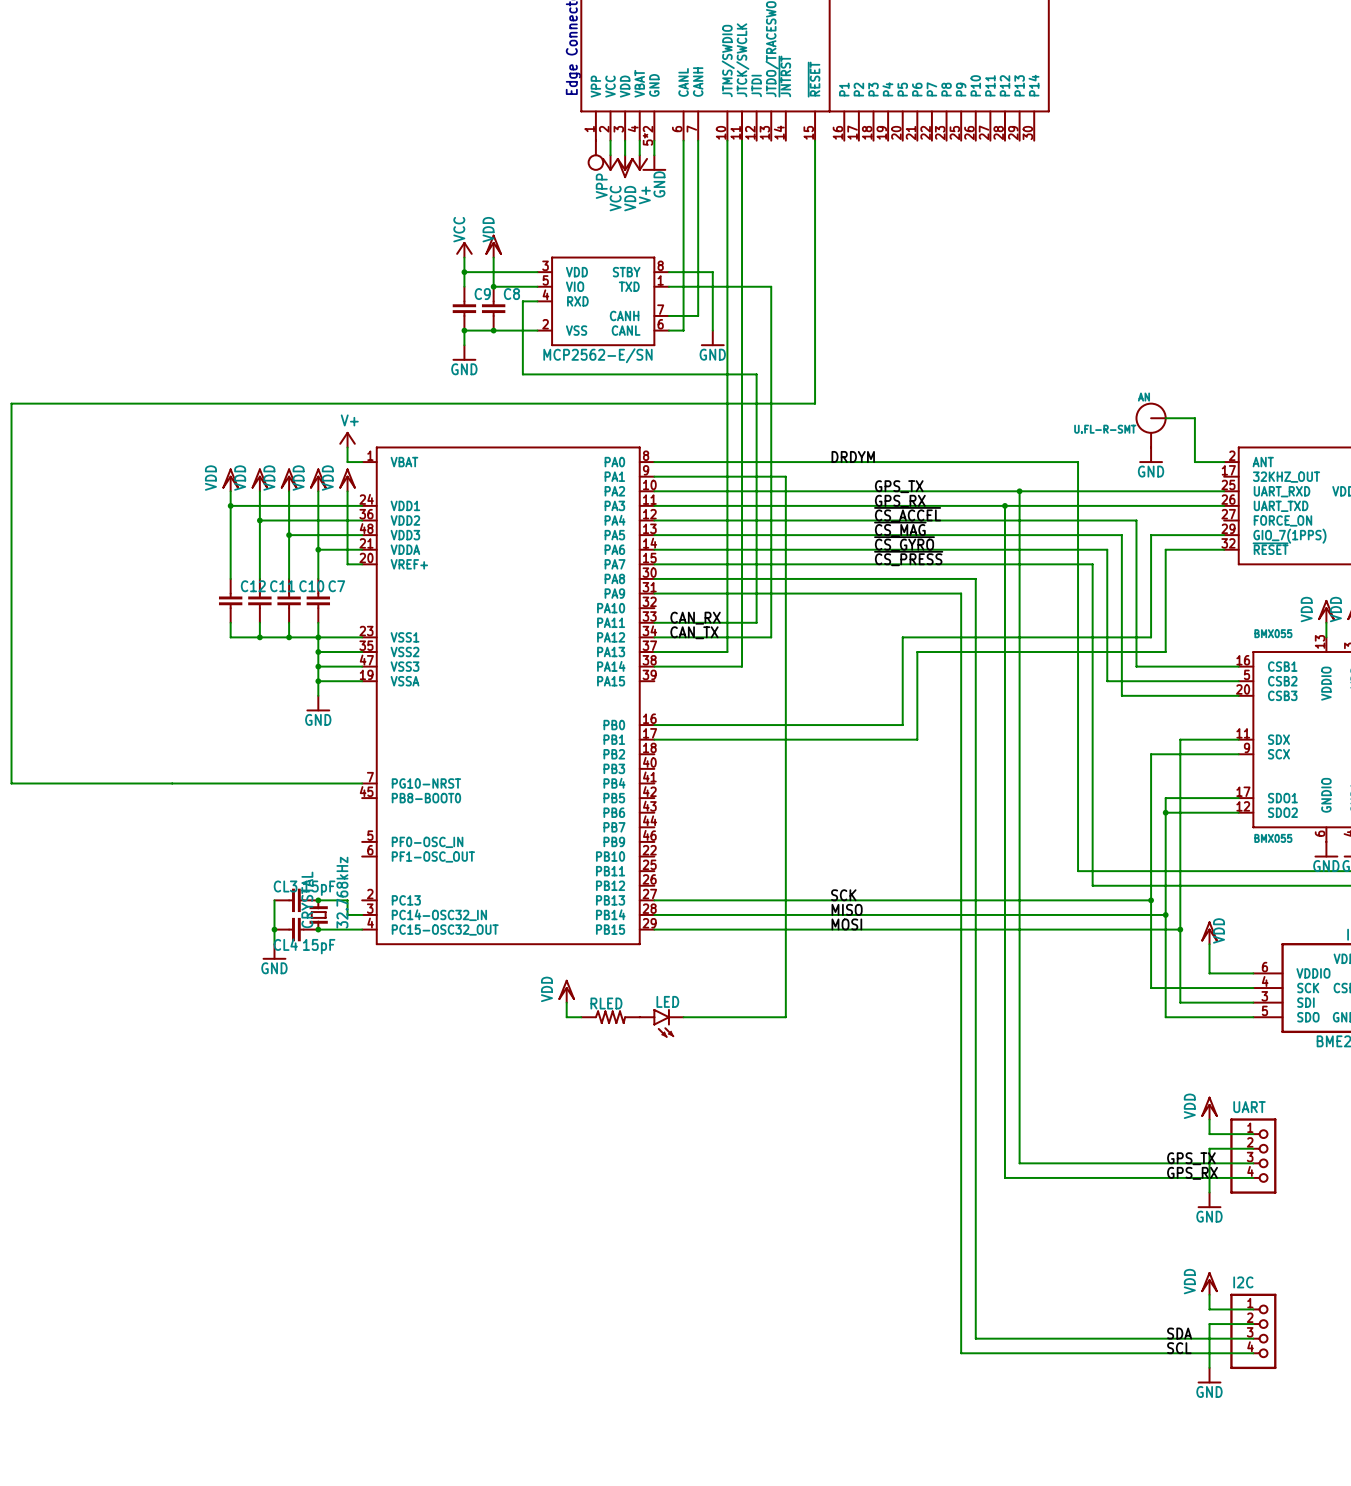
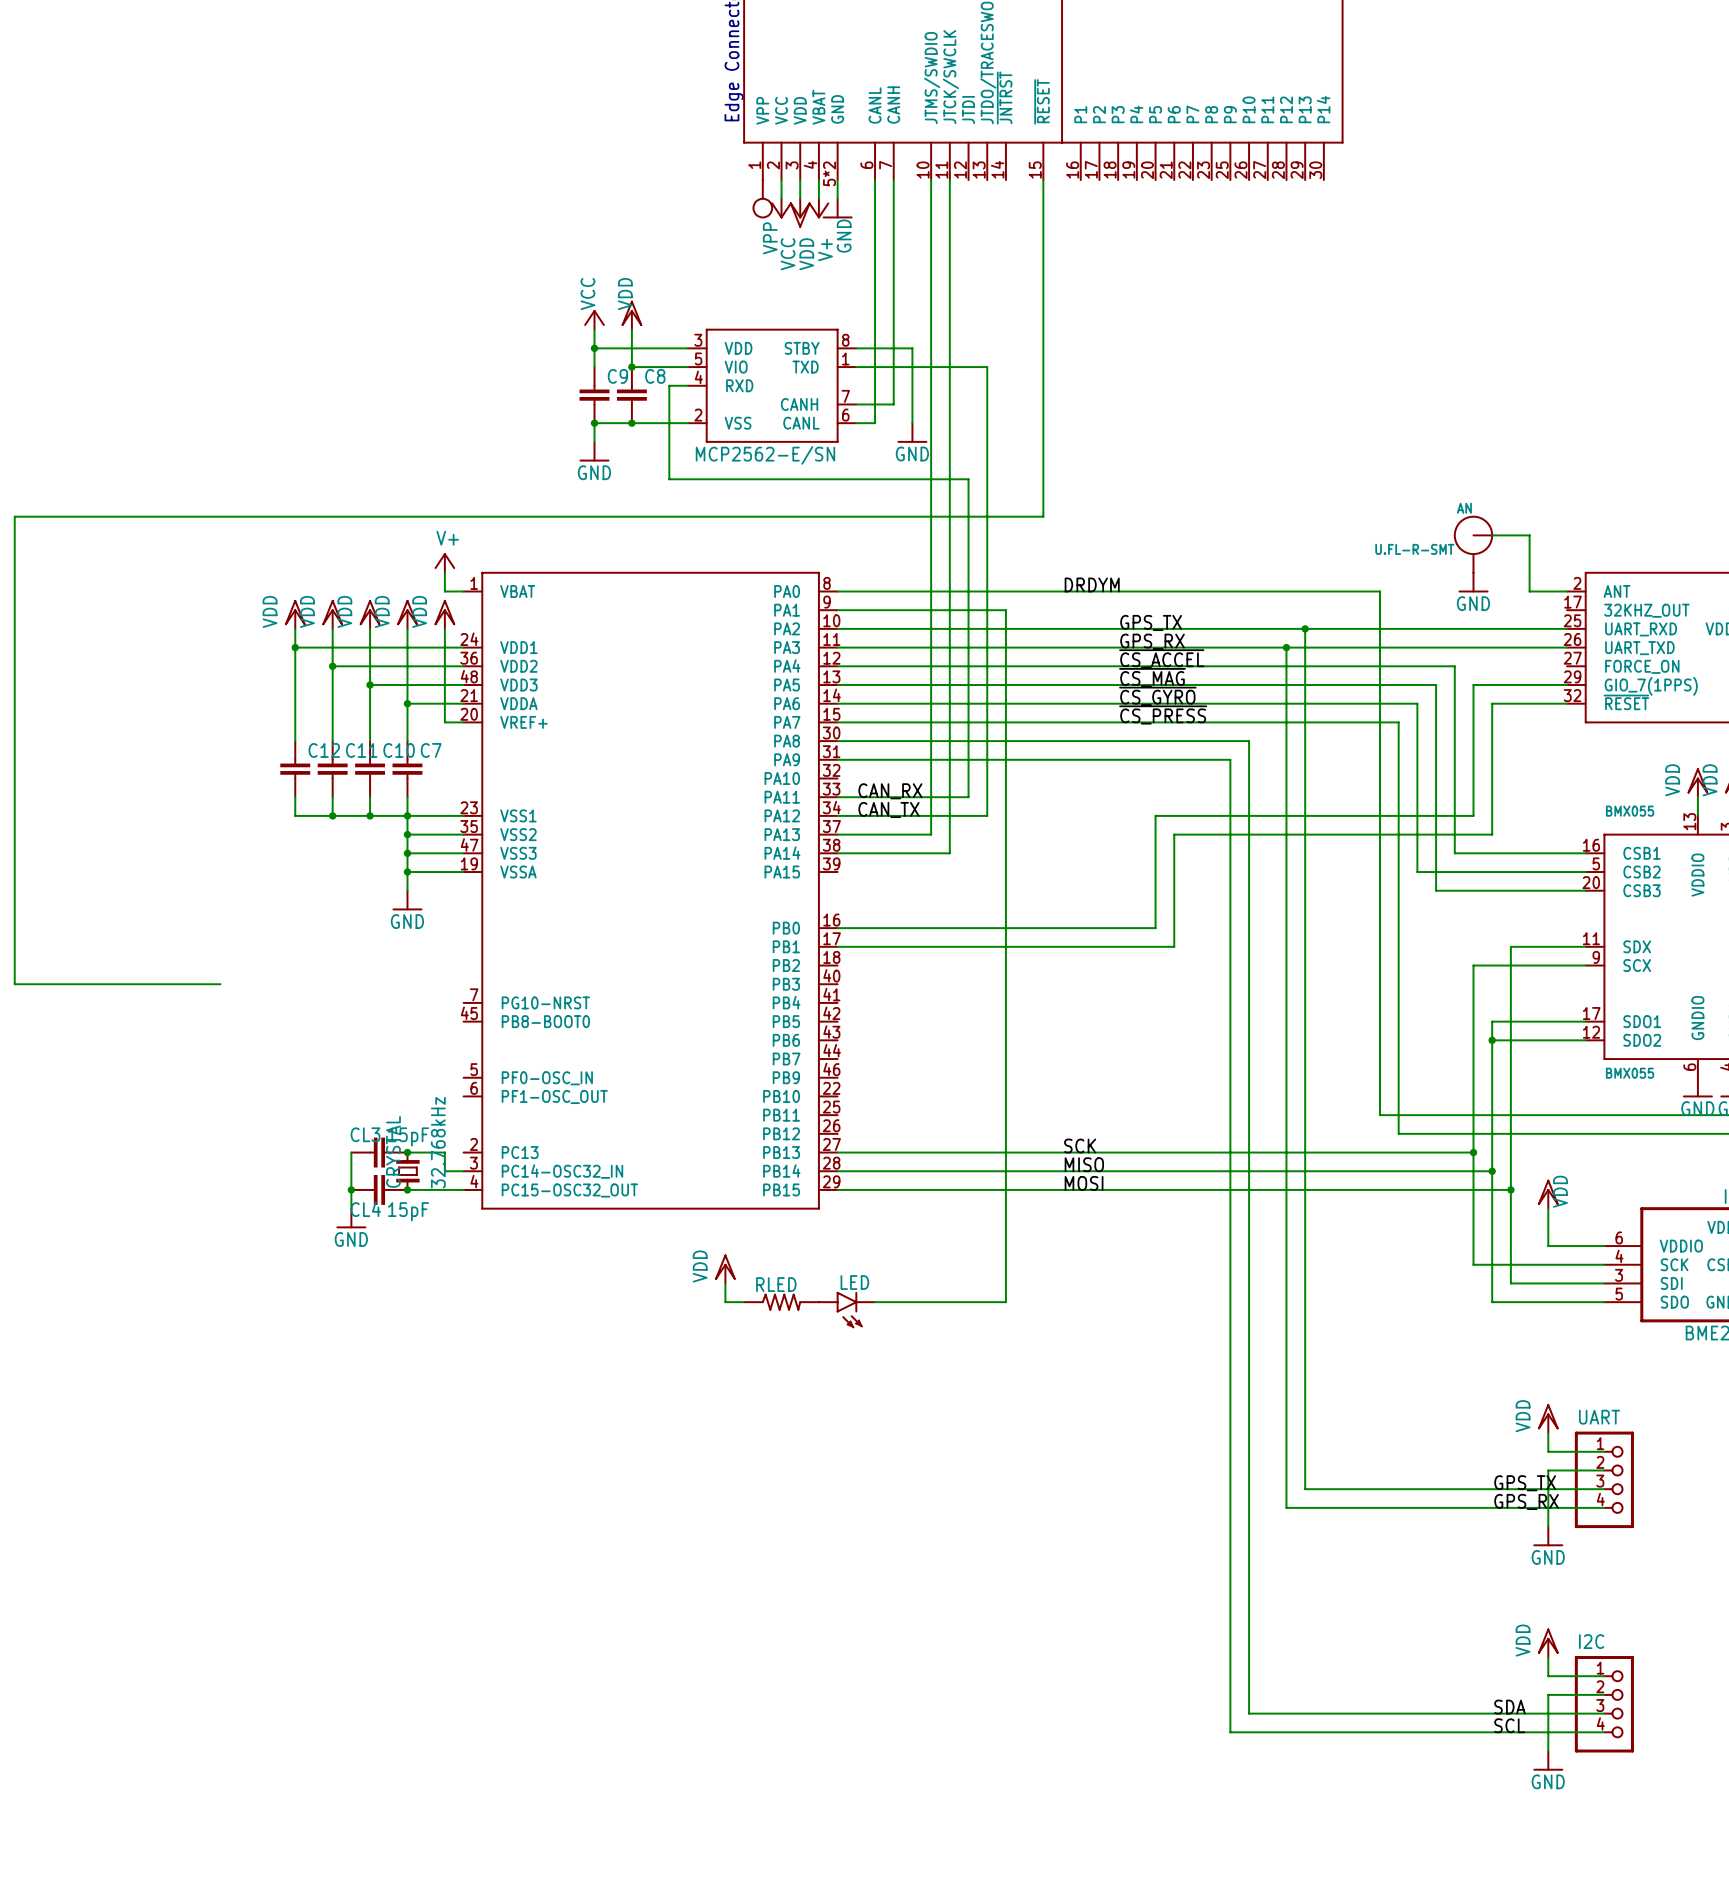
wire: (11, 768) (11, 783) (362, 783) -> (14, 984) (220, 984)

